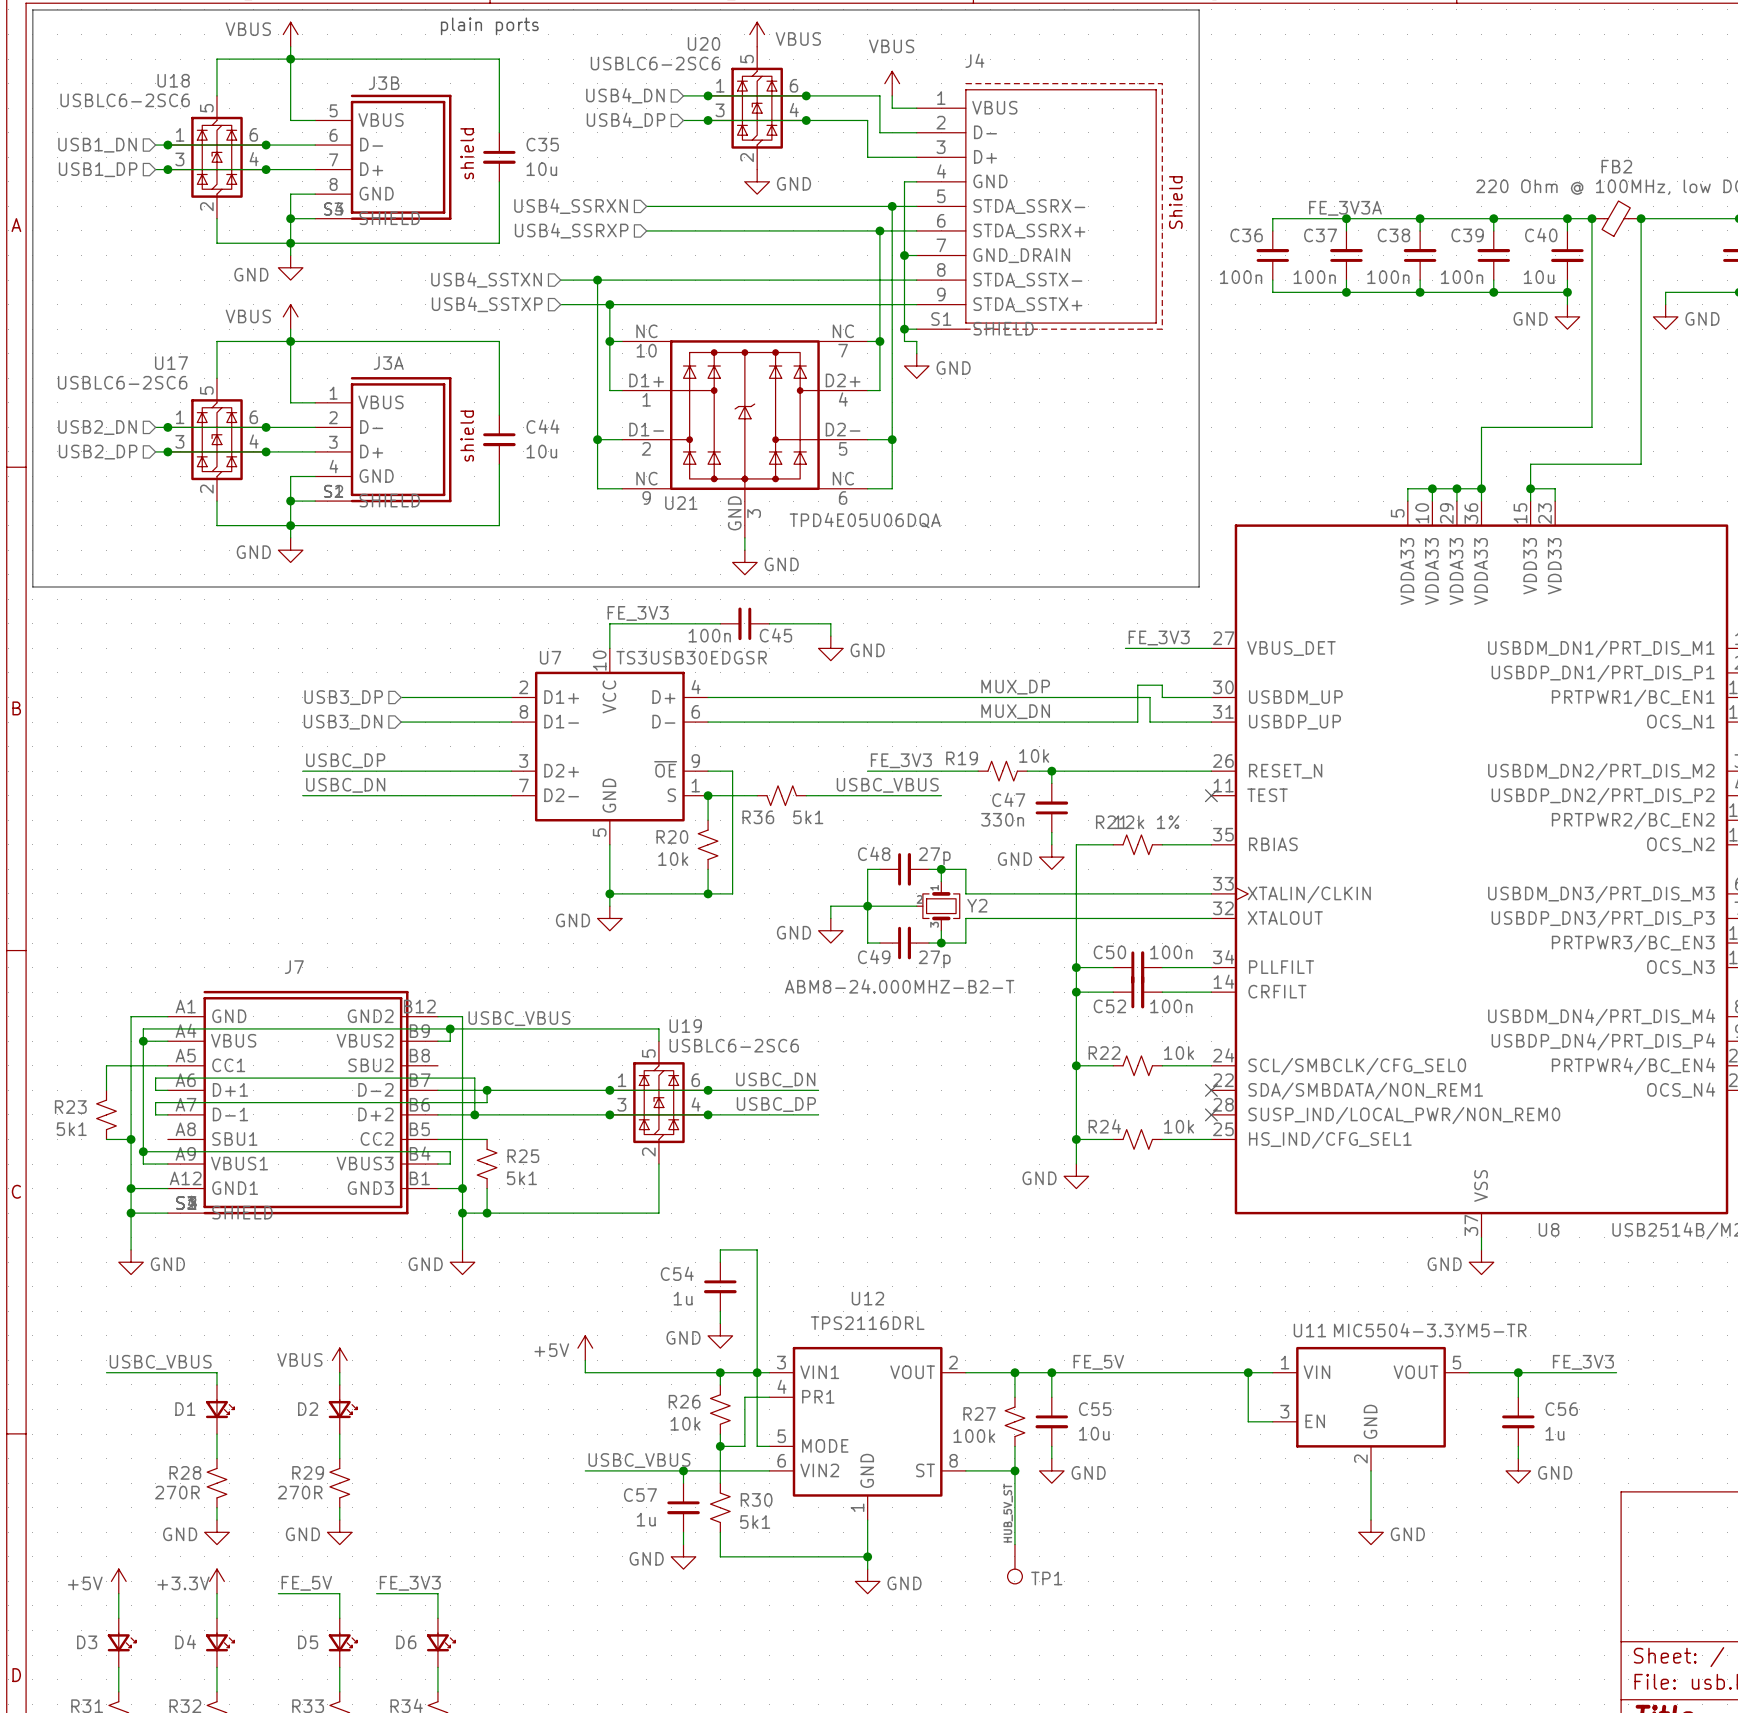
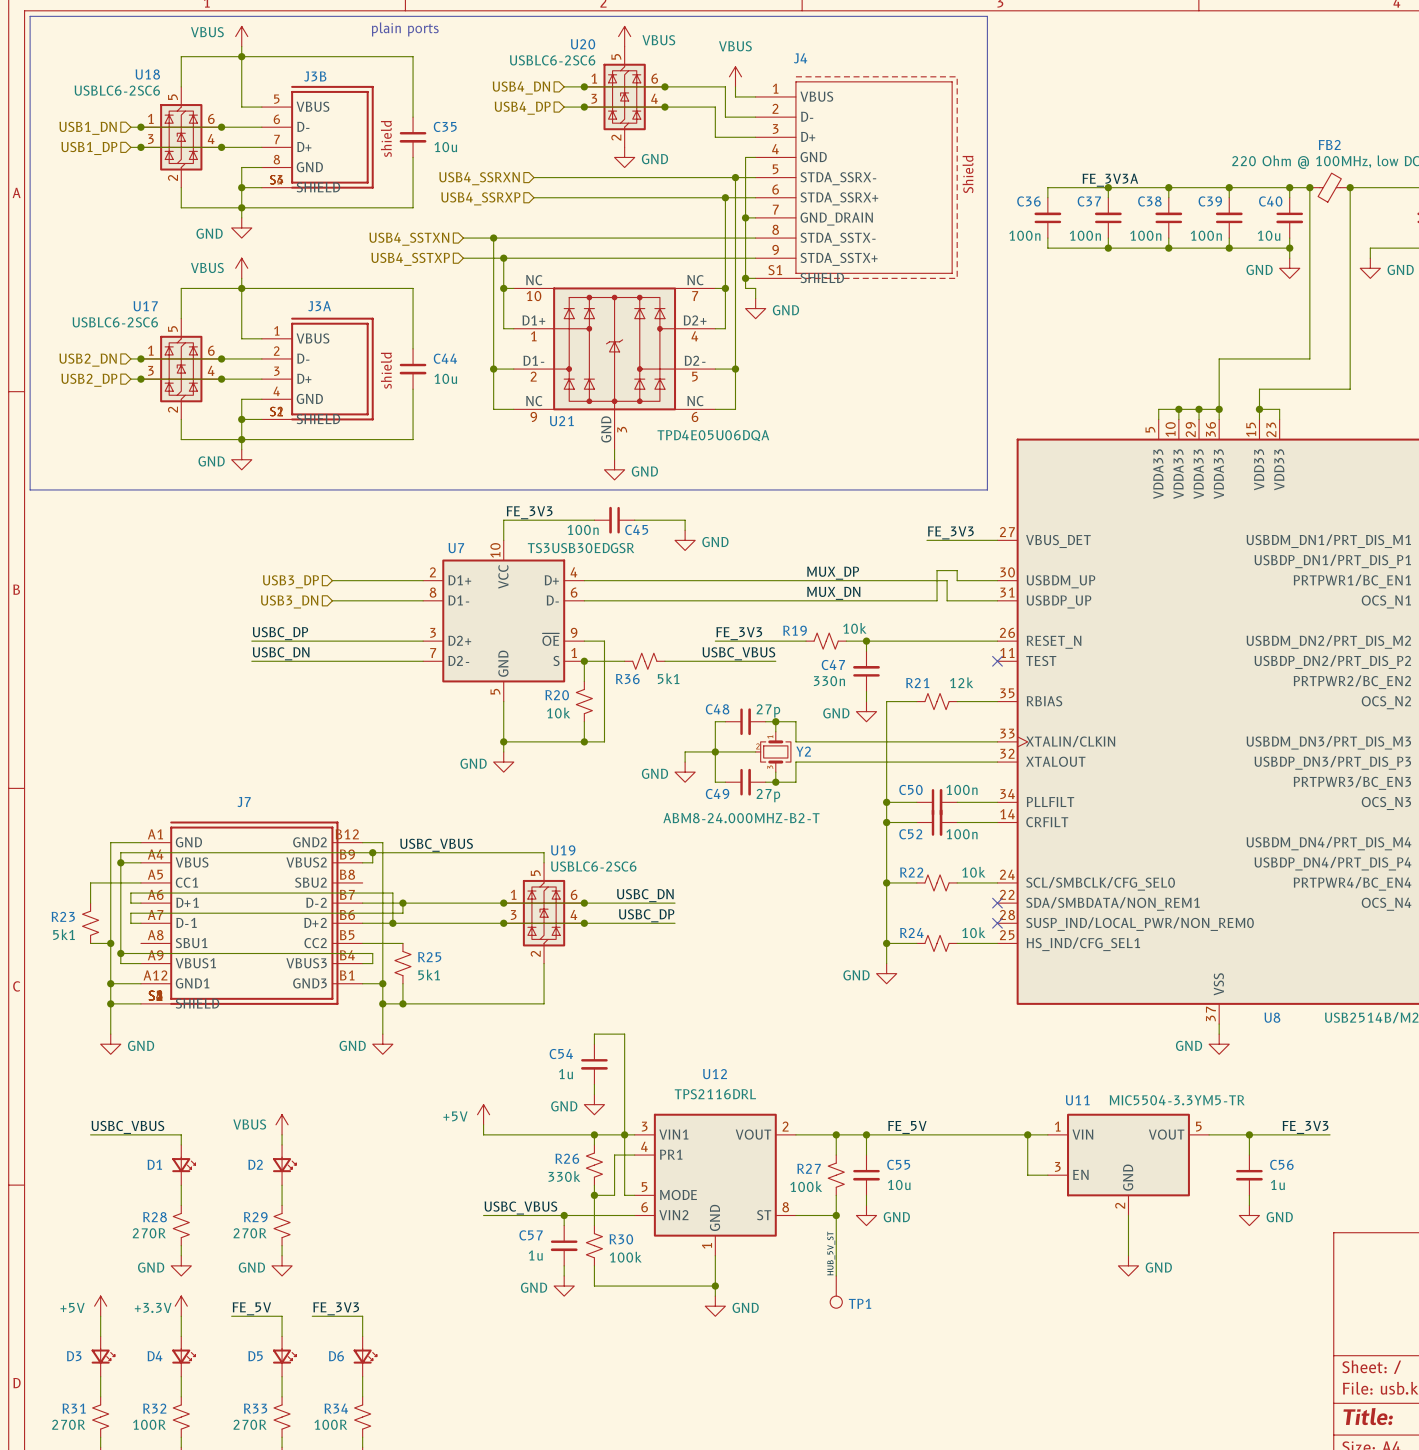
R21 value: 12k 1% (1146, 822) -> 12k (961, 682)
R26 value: 10k (685, 1423) -> 330k (564, 1176)
R30 value: 5k1 (755, 1522) -> 100k (625, 1257)

